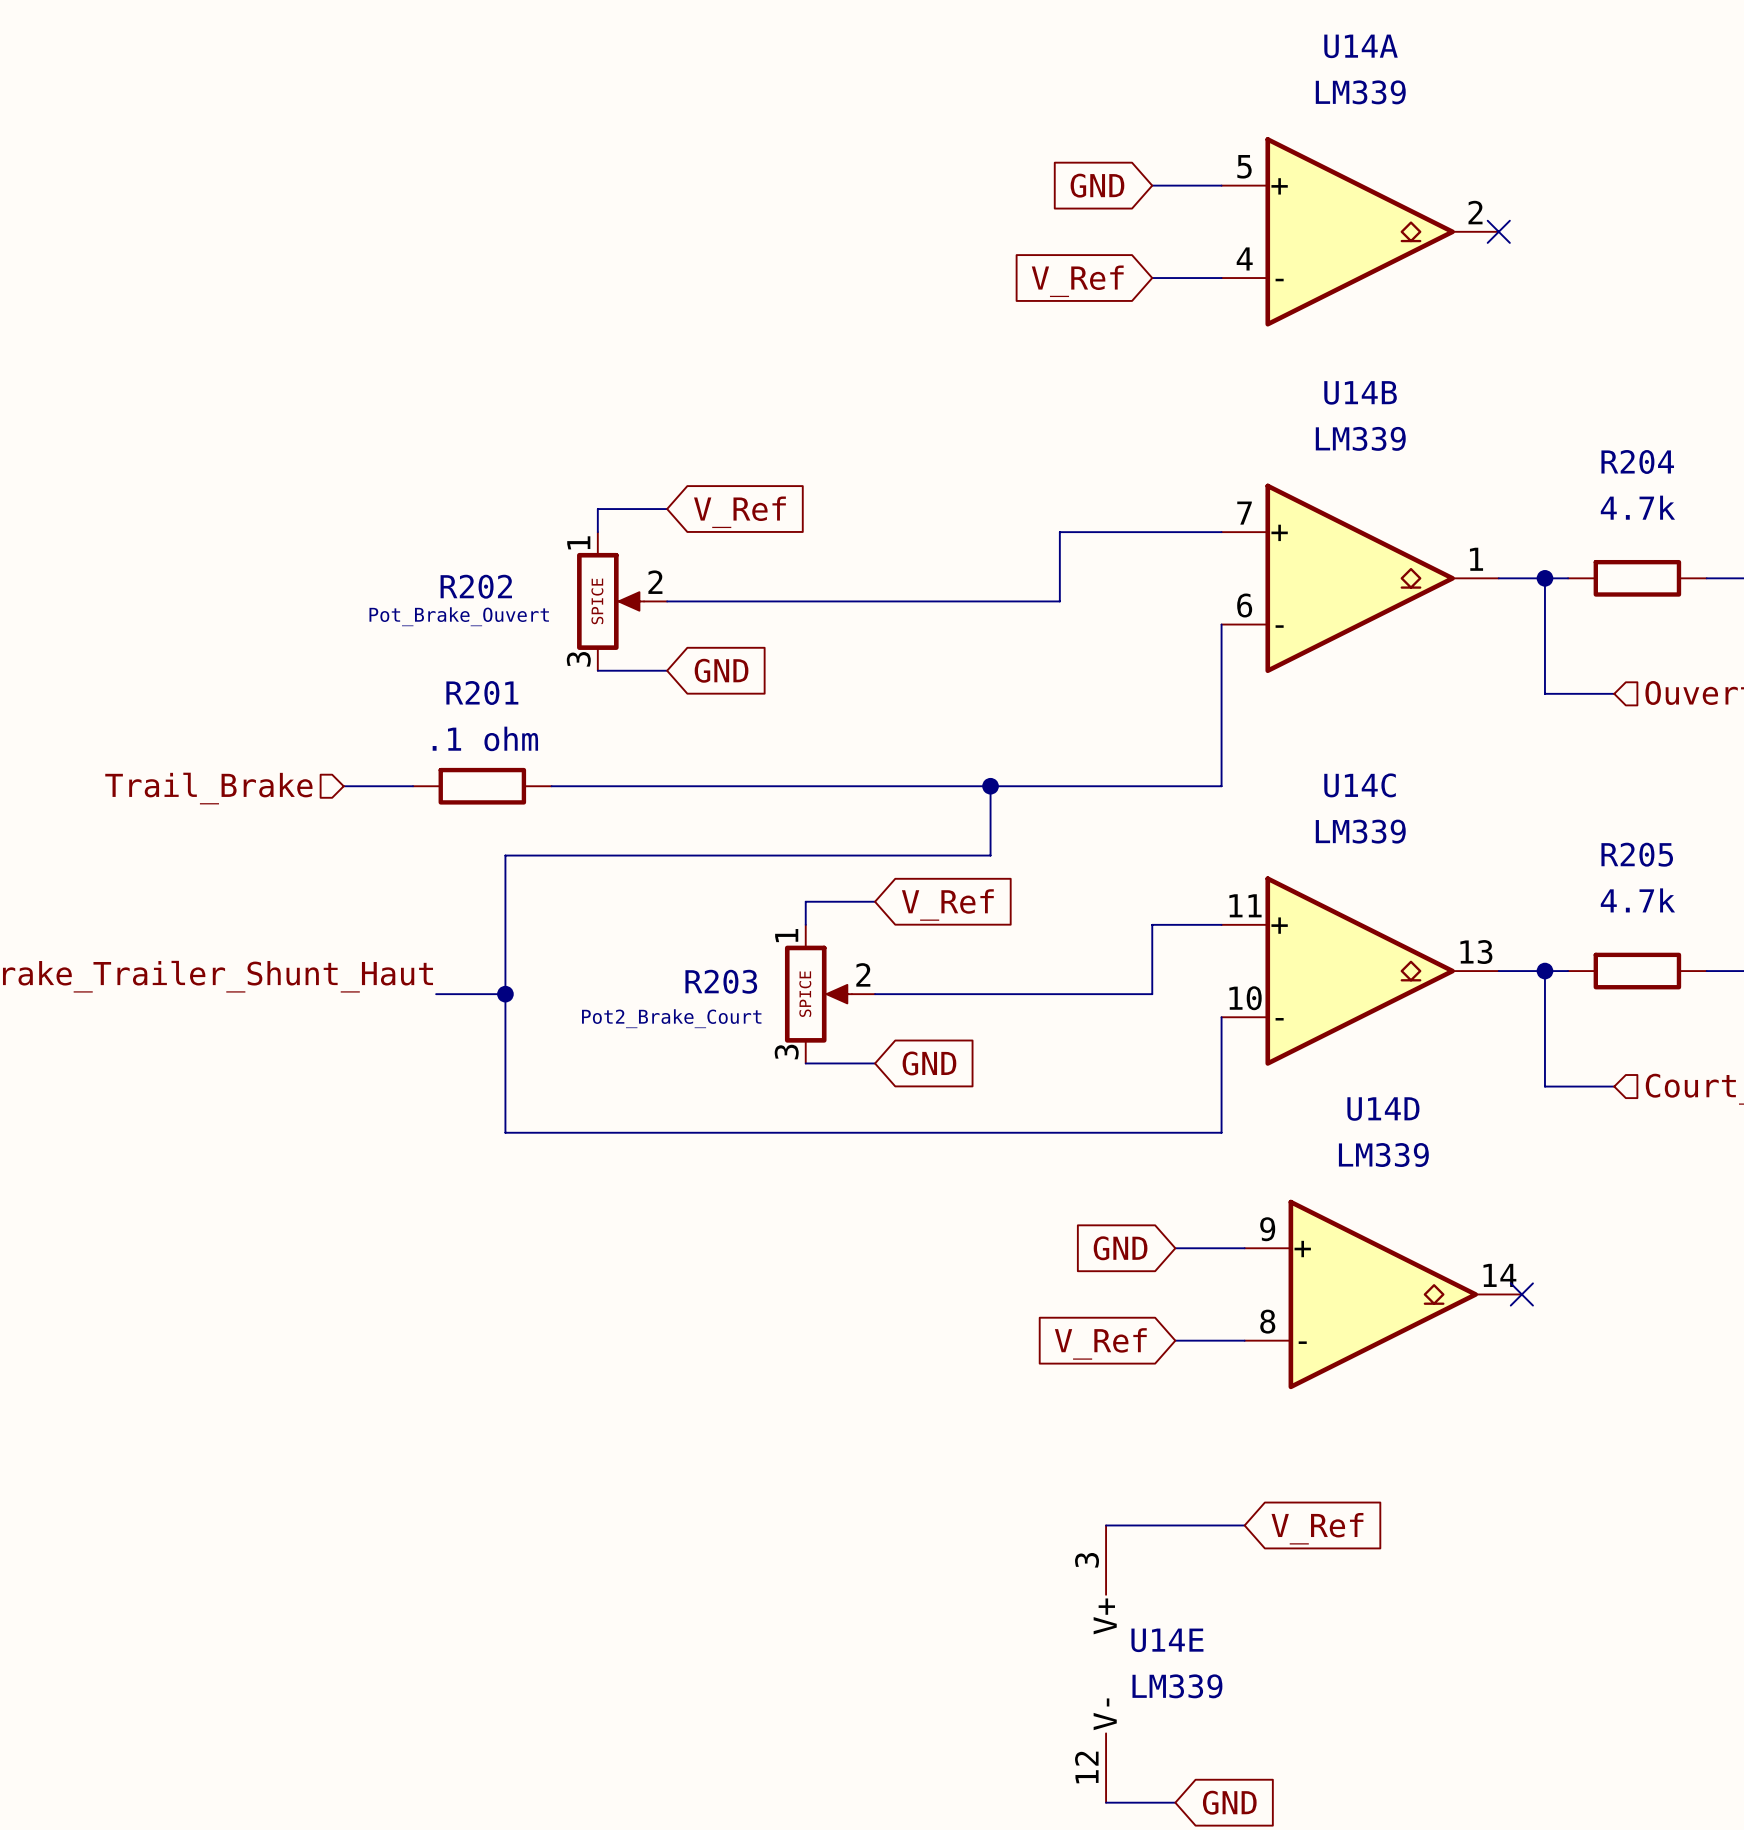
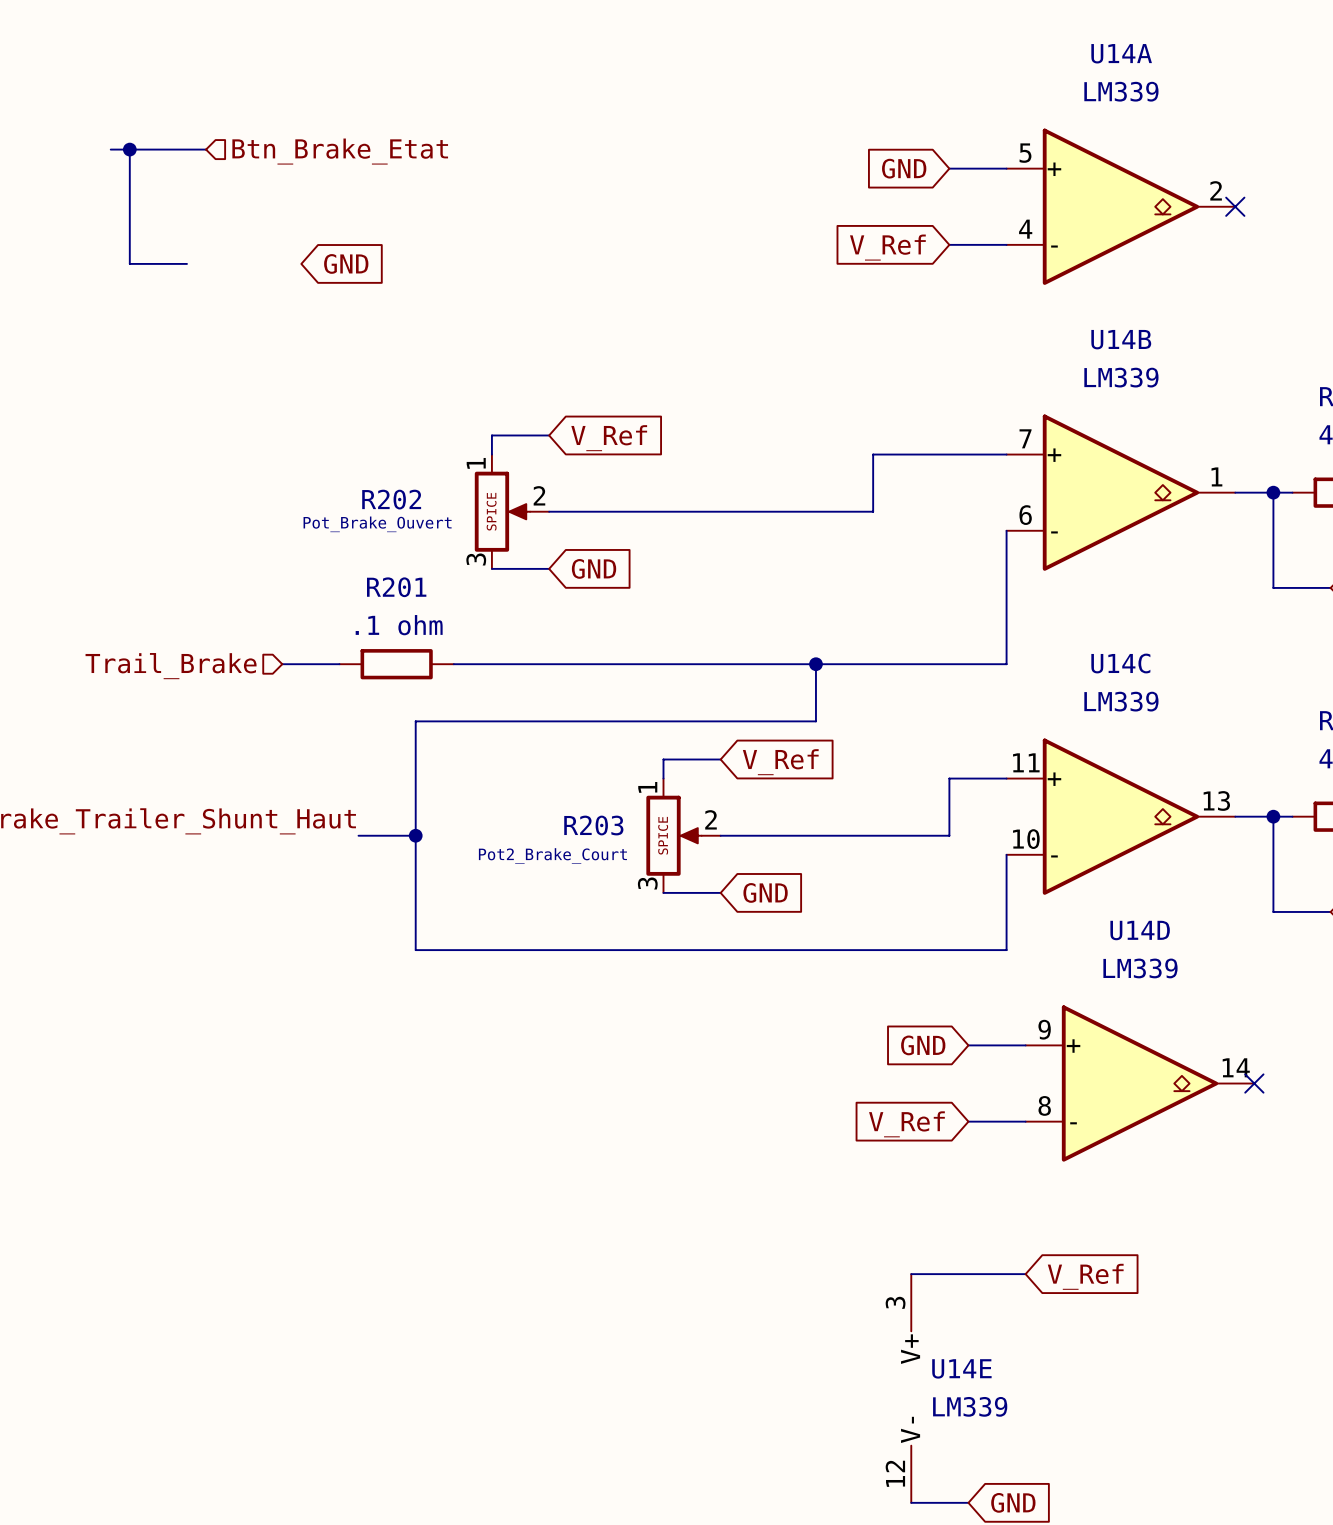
wire: none -> (110, 149) (206, 149)
wire: none -> (129, 149) (129, 263) (186, 263)
junction: none -> (129, 149)
hierarchical label: none -> Btn_Brake_Etat (340, 151)
global label: none -> GND (346, 263)

